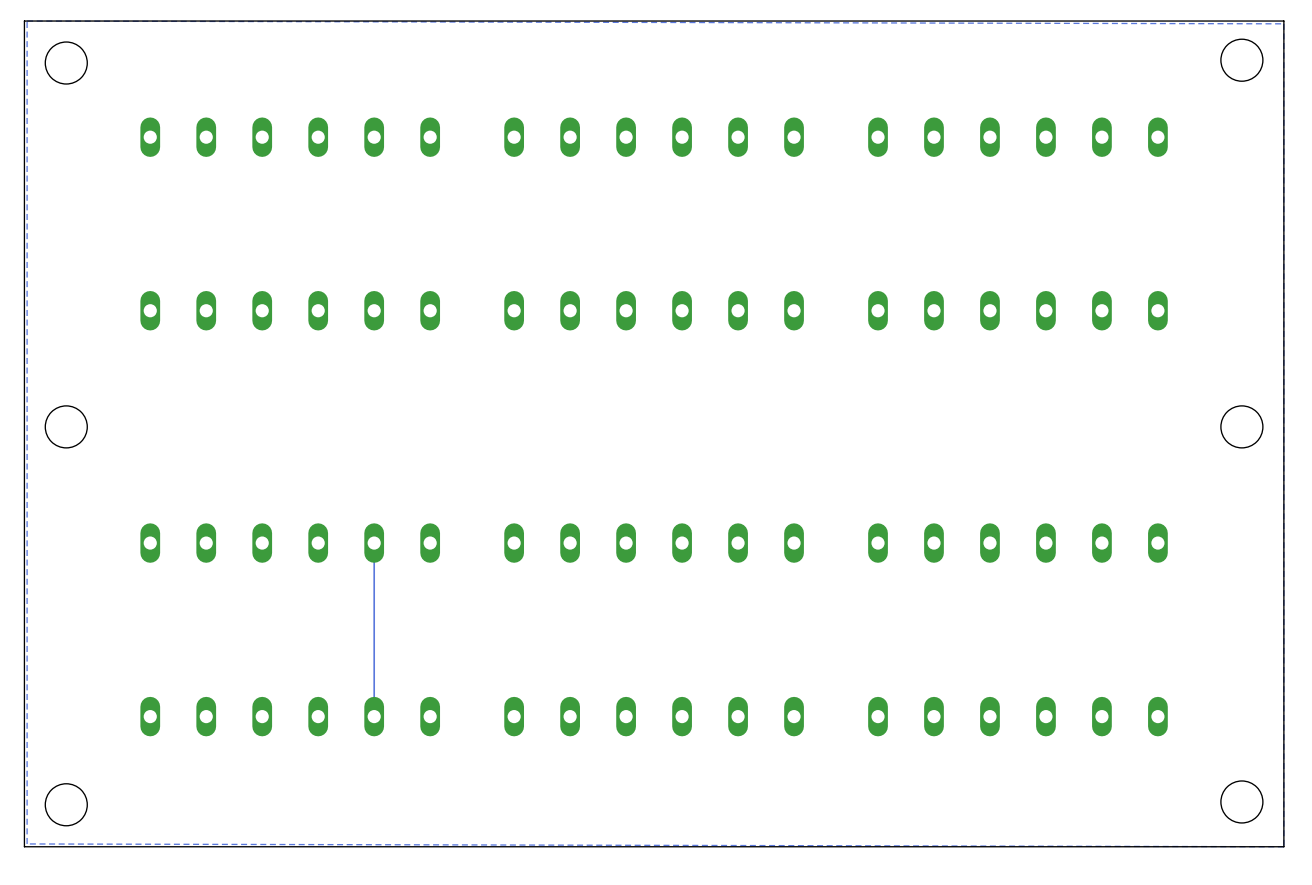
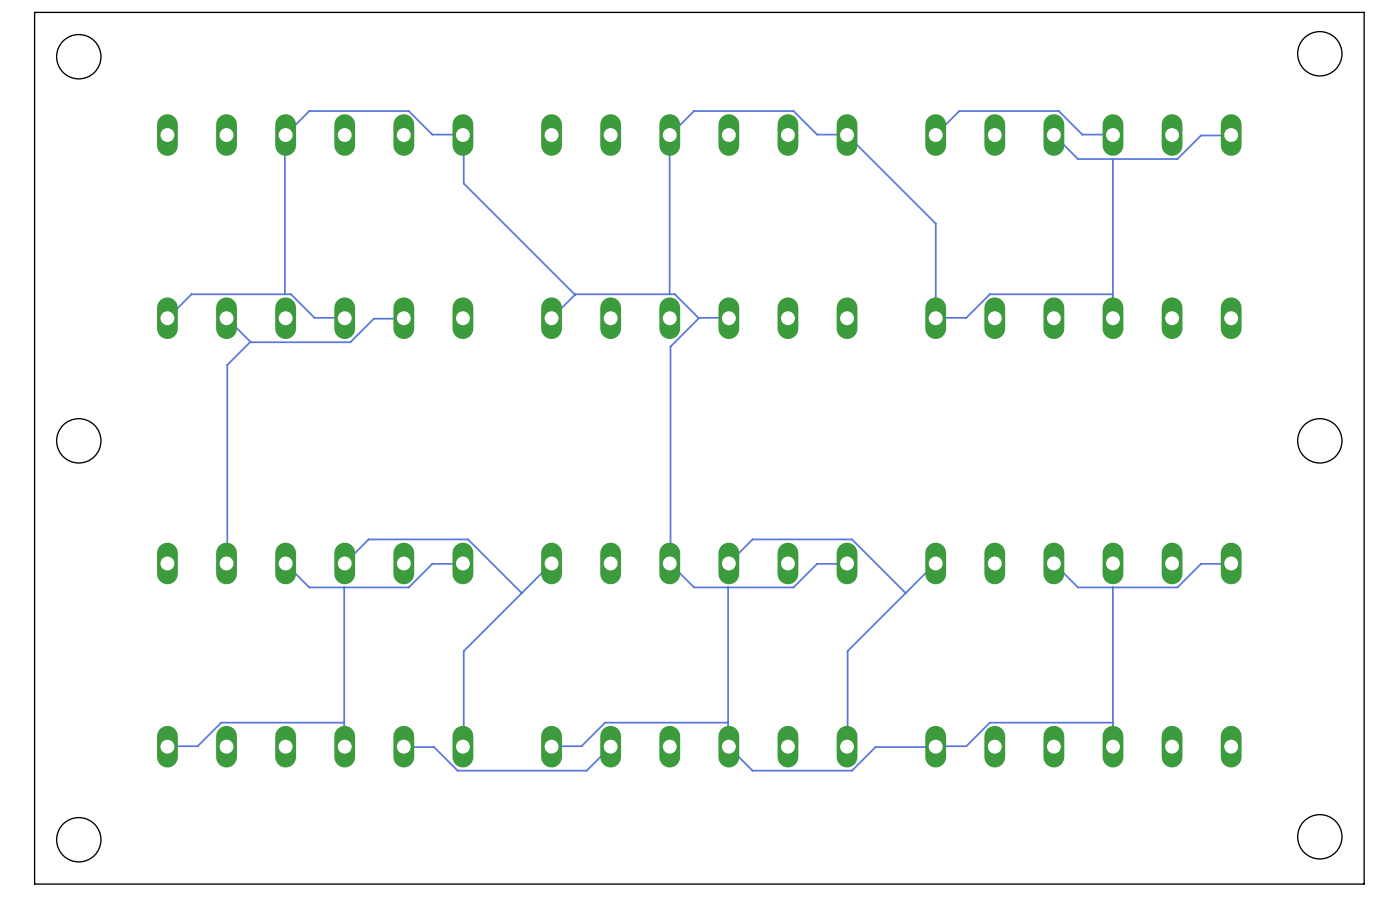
zone outline: (27, 21) (27, 843) (1283, 846) (1283, 23) (27, 21) -> none
track: none -> (1112, 135) (1082, 134) (1058, 111) (959, 111) (935, 135)
track: none -> (1231, 135) (1200, 135) (1177, 159) (1077, 159) (1053, 135)
track: none -> (1112, 159) (1112, 318)
track: none -> (284, 294) (284, 135) (309, 111) (408, 111) (432, 134) (463, 135) (463, 183) (574, 294)
track: none -> (1112, 294) (989, 294) (966, 317) (935, 318) (935, 223) (846, 134) (817, 134) (793, 111) (694, 111) (669, 135) (669, 294)
track: none -> (344, 318) (314, 317) (290, 294) (191, 294) (167, 318)
track: none -> (403, 318) (373, 318) (350, 342) (250, 342) (226, 318)
track: none -> (699, 317) (670, 346) (669, 563) (694, 587) (793, 587) (817, 563) (847, 563)
track: none -> (728, 318) (698, 317) (674, 294) (575, 294) (551, 318)
track: none -> (250, 341) (227, 364) (226, 563)
track: none -> (344, 563) (368, 539) (468, 539) (521, 593)
track: (374, 543) (374, 716) -> (610, 746) (586, 770) (457, 770) (434, 747) (403, 746)
track: none -> (462, 563) (432, 563) (408, 587) (309, 587) (285, 563)
track: none -> (551, 563) (463, 651) (462, 746)
track: none -> (728, 563) (752, 539) (851, 539) (905, 593)
track: none -> (935, 563) (847, 651) (847, 746)
track: none -> (1231, 563) (1200, 563) (1177, 587) (1077, 587) (1053, 563)
track: none -> (344, 587) (344, 746)
track: none -> (728, 587) (728, 746) (752, 770) (851, 770) (875, 747) (966, 746) (989, 722) (1112, 722)
track: none -> (1112, 587) (1112, 746)
track: none -> (344, 722) (221, 722) (197, 746) (167, 746)
track: none -> (728, 722) (605, 722) (581, 746) (551, 746)

